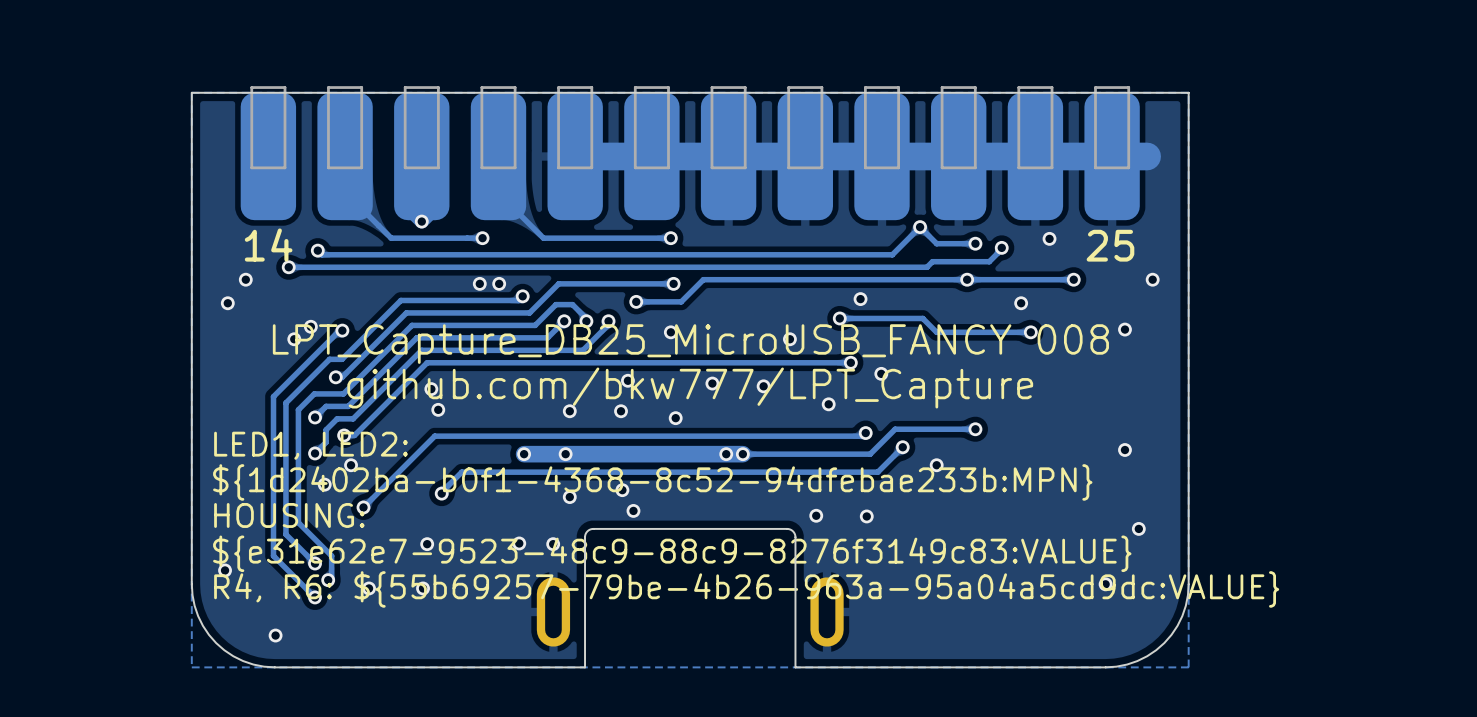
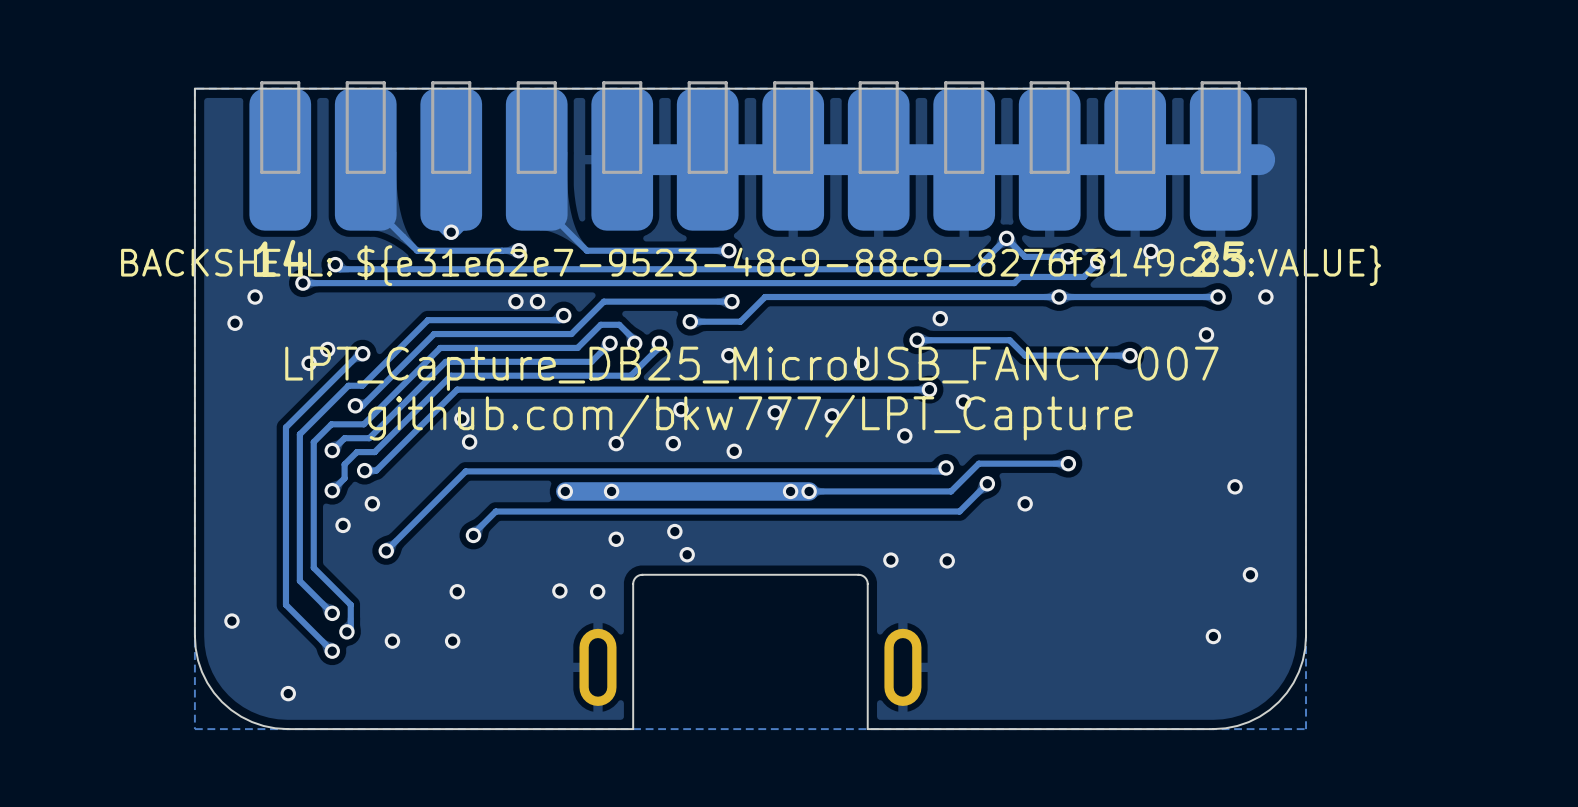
text: none -> BACKSHELL: ${e31e62e7-9523-48c9-88c9-8276f3149c83:VALUE} (751, 265)
via: (1073, 279) -> none
track: none -> (1218, 297) (1177, 297)
via: none -> (1218, 297)
via: (1021, 303) -> none
via: none -> (1206, 334)
via: (1124, 329) -> none
text: LPT_Capture_DB25_MicroUSB_FANCY 008 (690, 344) -> LPT_Capture_DB25_MicroUSB_FANCY 007 (751, 368)
text: LED1, LED2: (310, 445) -> none
text: ${1d2402ba-b0f1-4368-8c52-94dfebae233b:MPN} (652, 482) -> none
text: HOUSING: (289, 515) -> none
text: ${e31e62e7-9523-48c9-88c9-8276f3149c83:VALUE} (672, 553) -> none
text: R4, R6: ${55b69257-79be-4b26-963a-95a04a5cd9dc:VALUE} (746, 589) -> none

